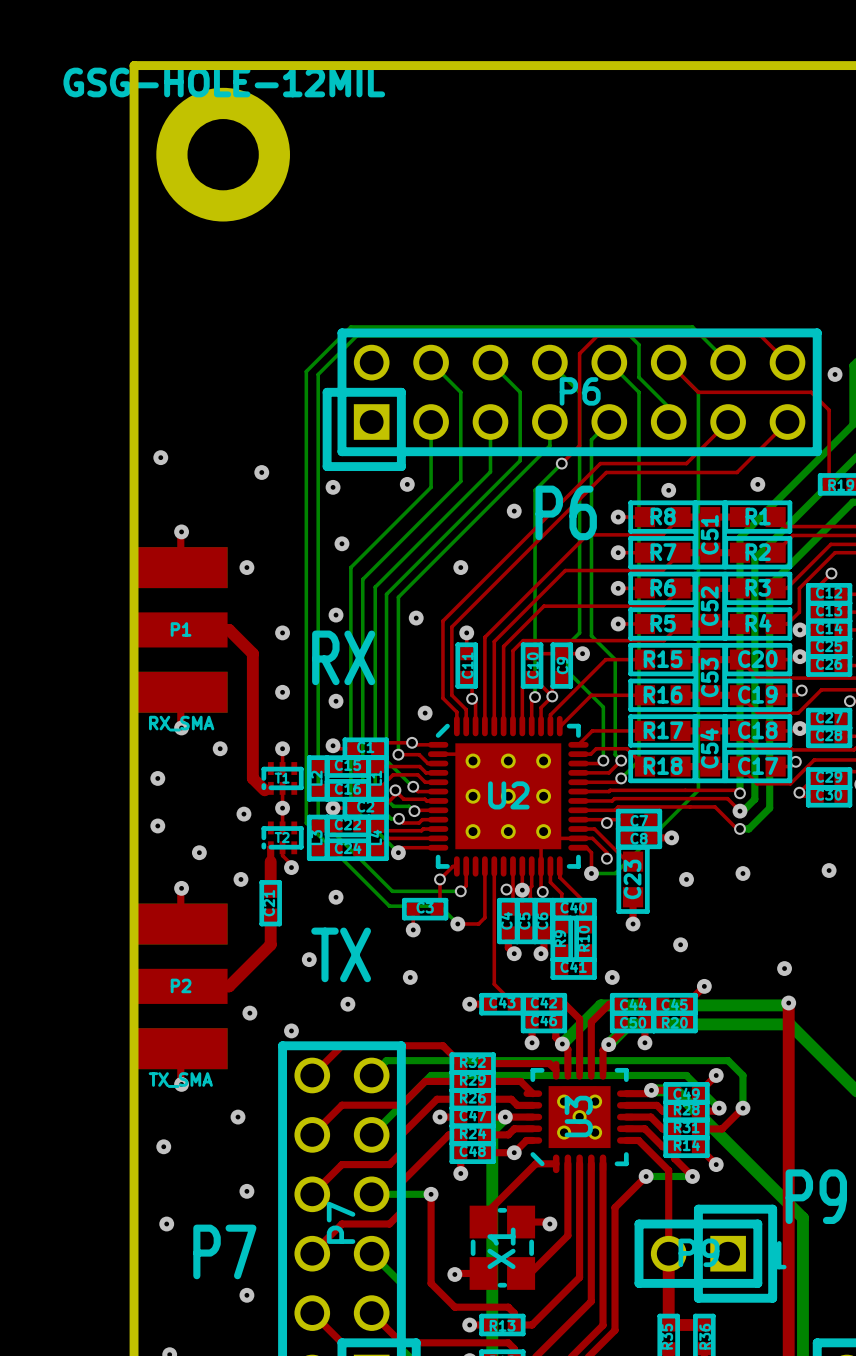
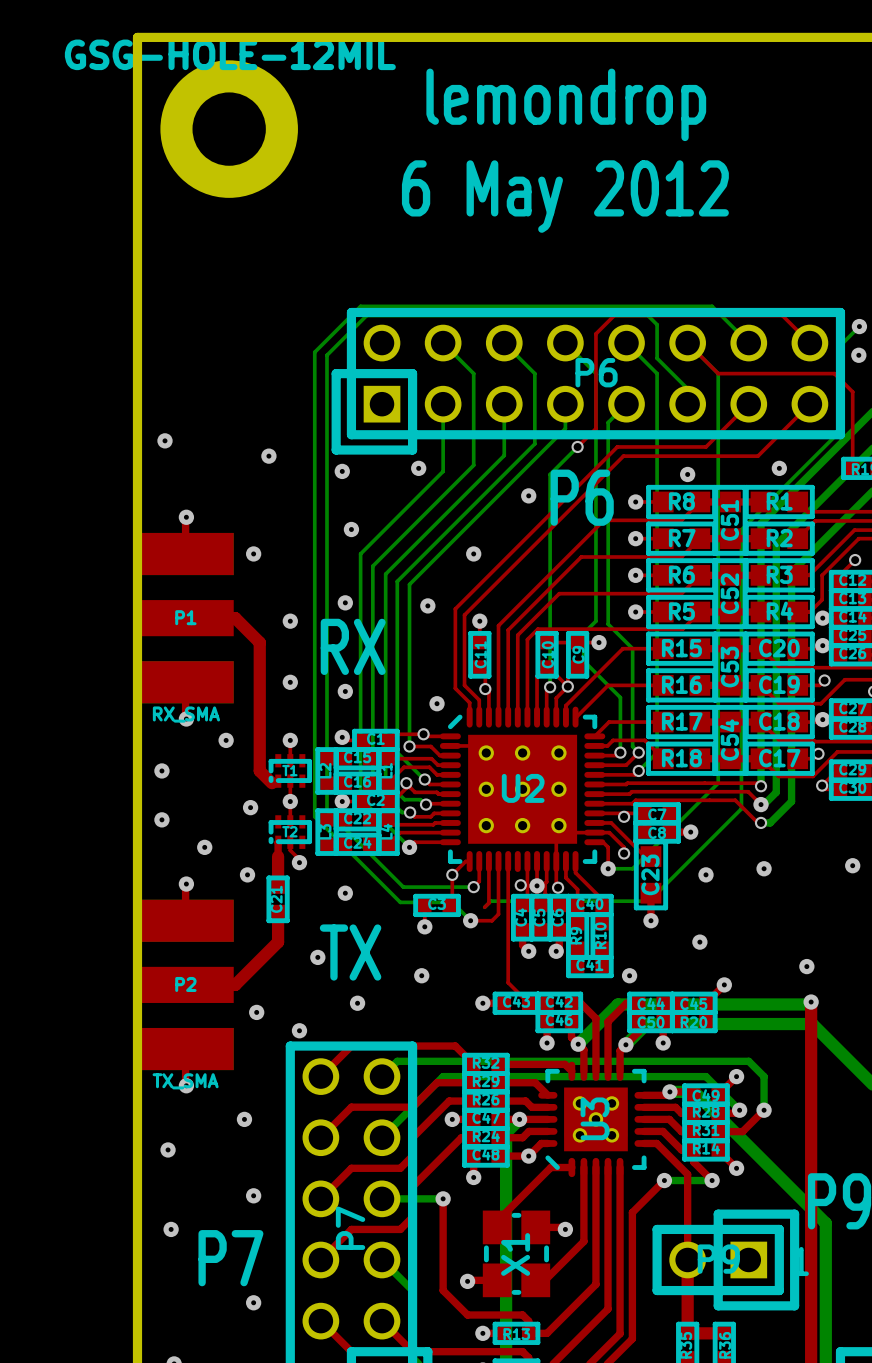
text: none -> lemondrop (566, 104)
text: none -> 6 May 2012 (565, 196)
bottom track: none -> (859, 326) (839, 346) (839, 432) (741, 529) (741, 808) (649, 901) (490, 901) (484, 907)
via: none -> (859, 326)
top track: none -> (488, 861) (488, 903) (484, 907)

